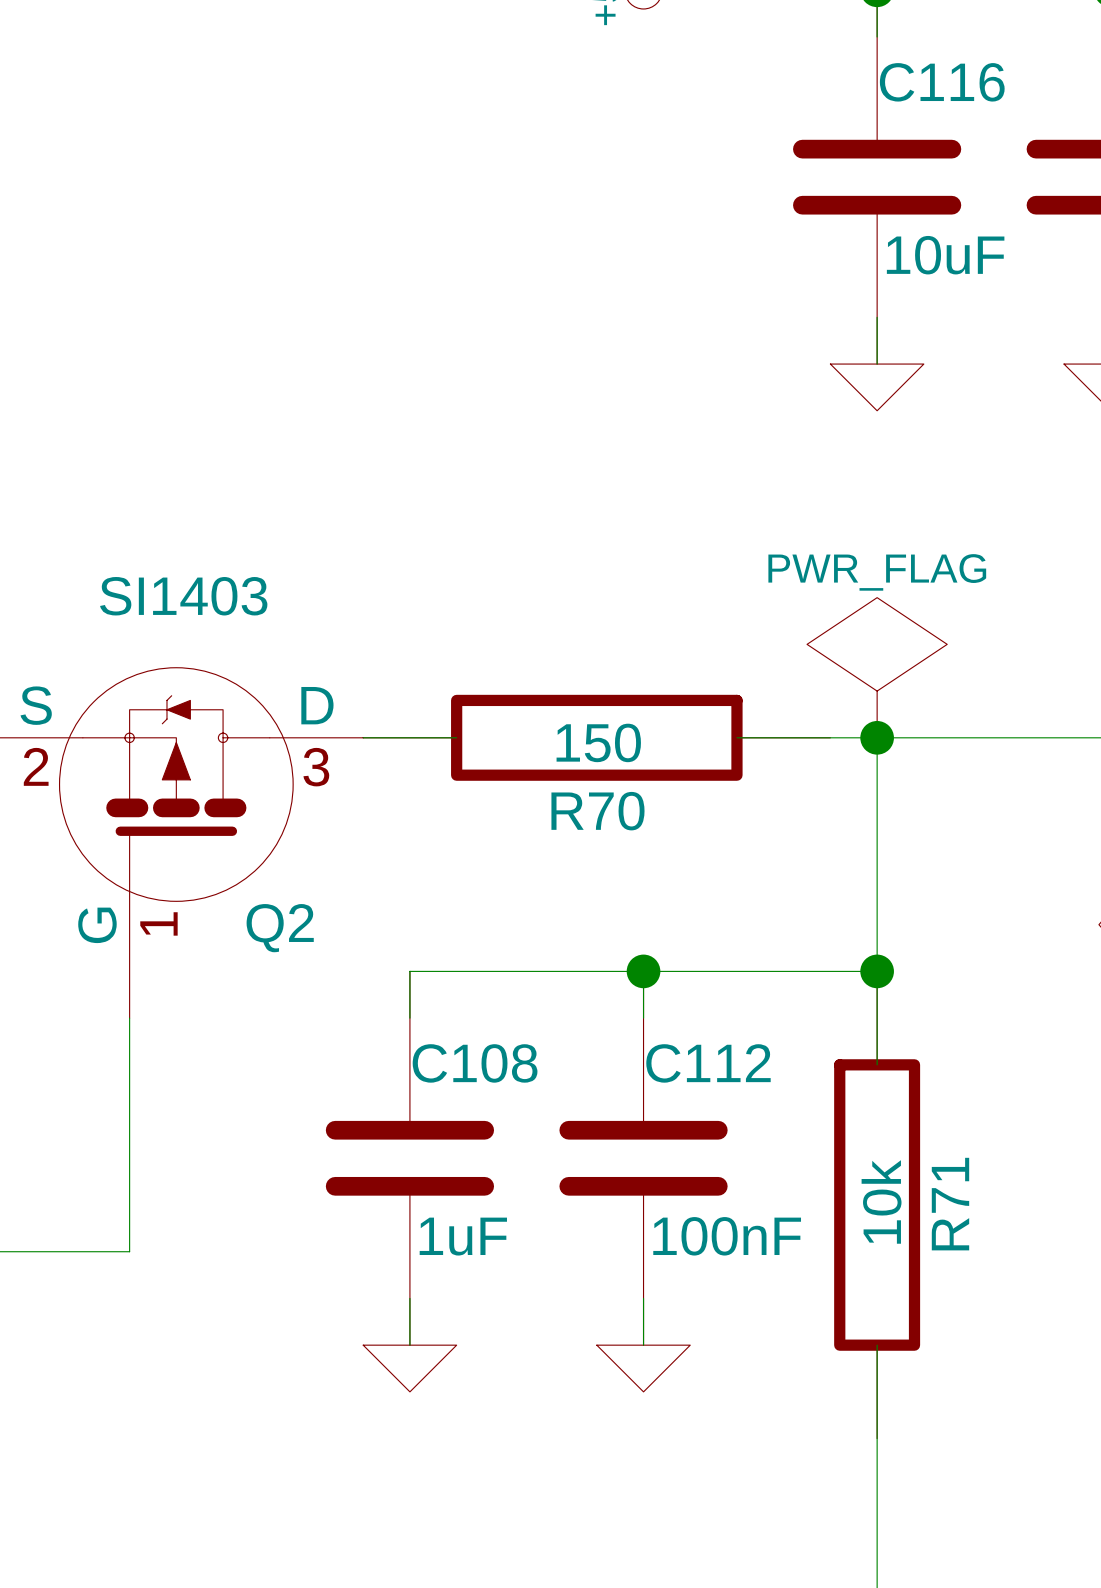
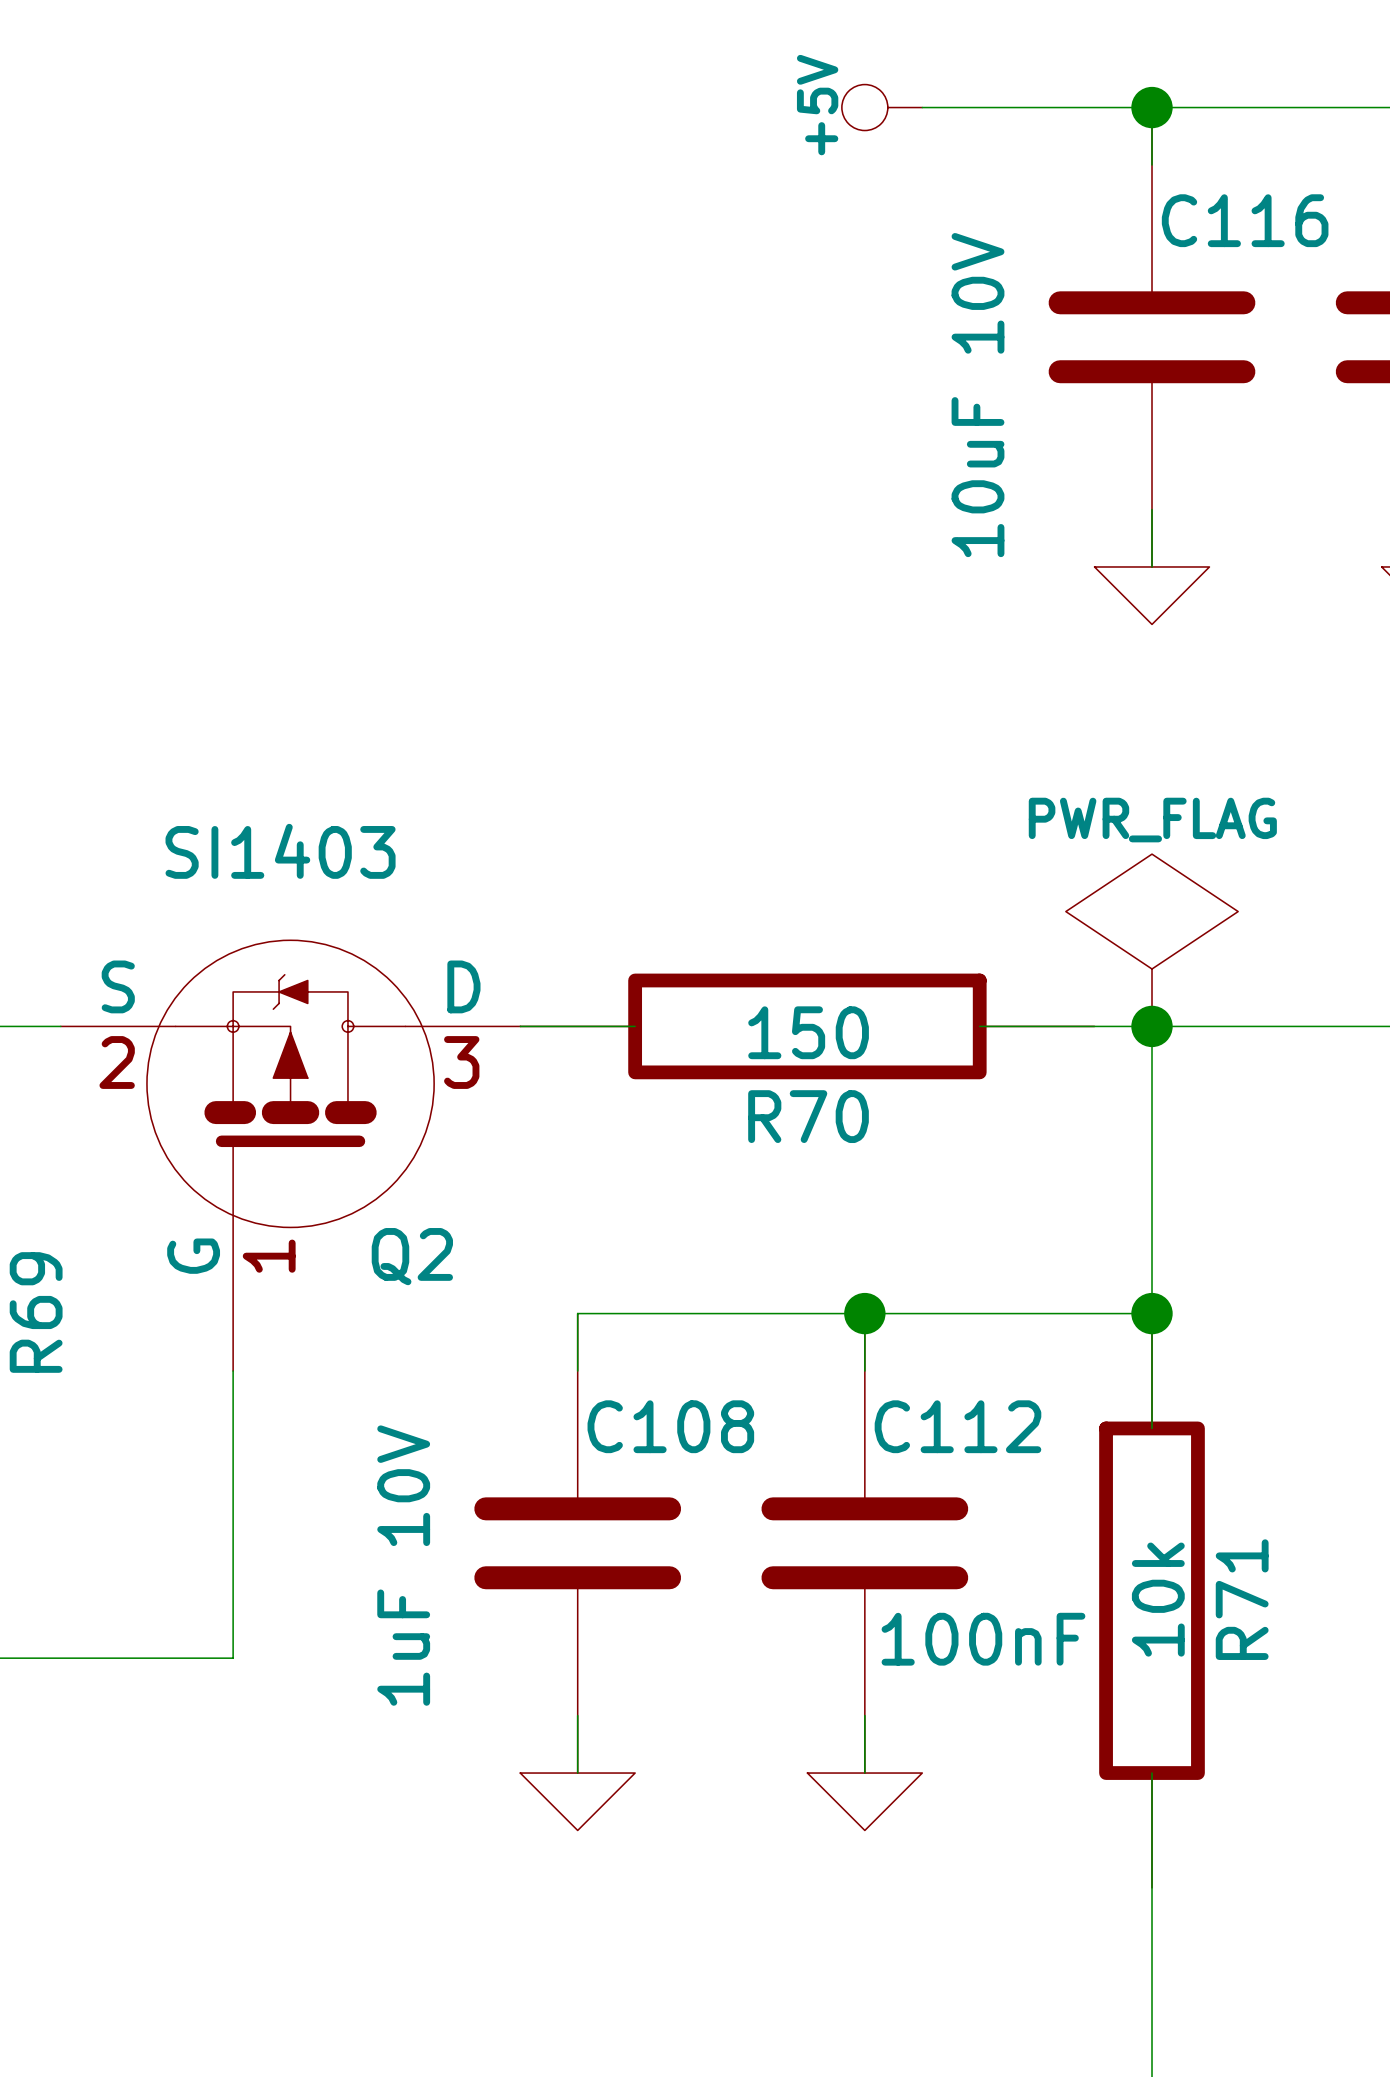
C116 value: 10uF (945, 255) -> 10uF 10V (977, 395)
C108 value: 1uF (463, 1236) -> 1uF 10V (403, 1565)

